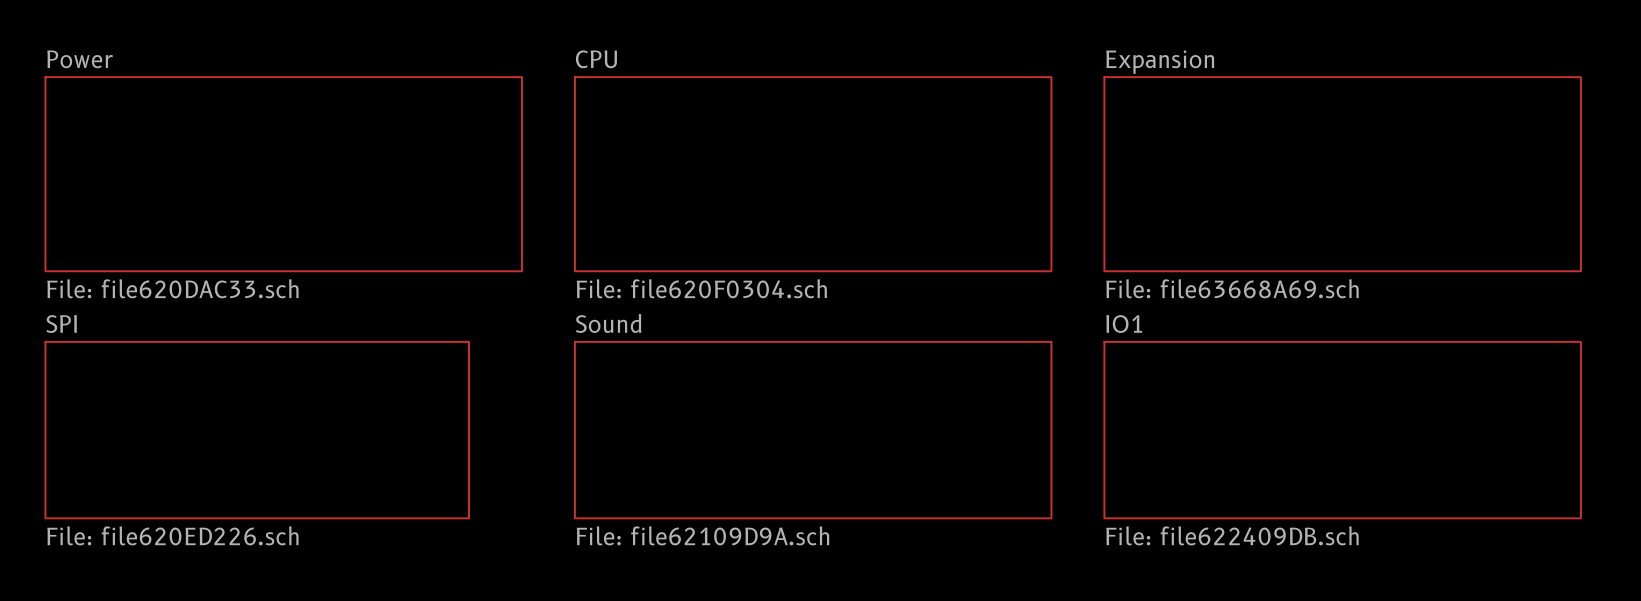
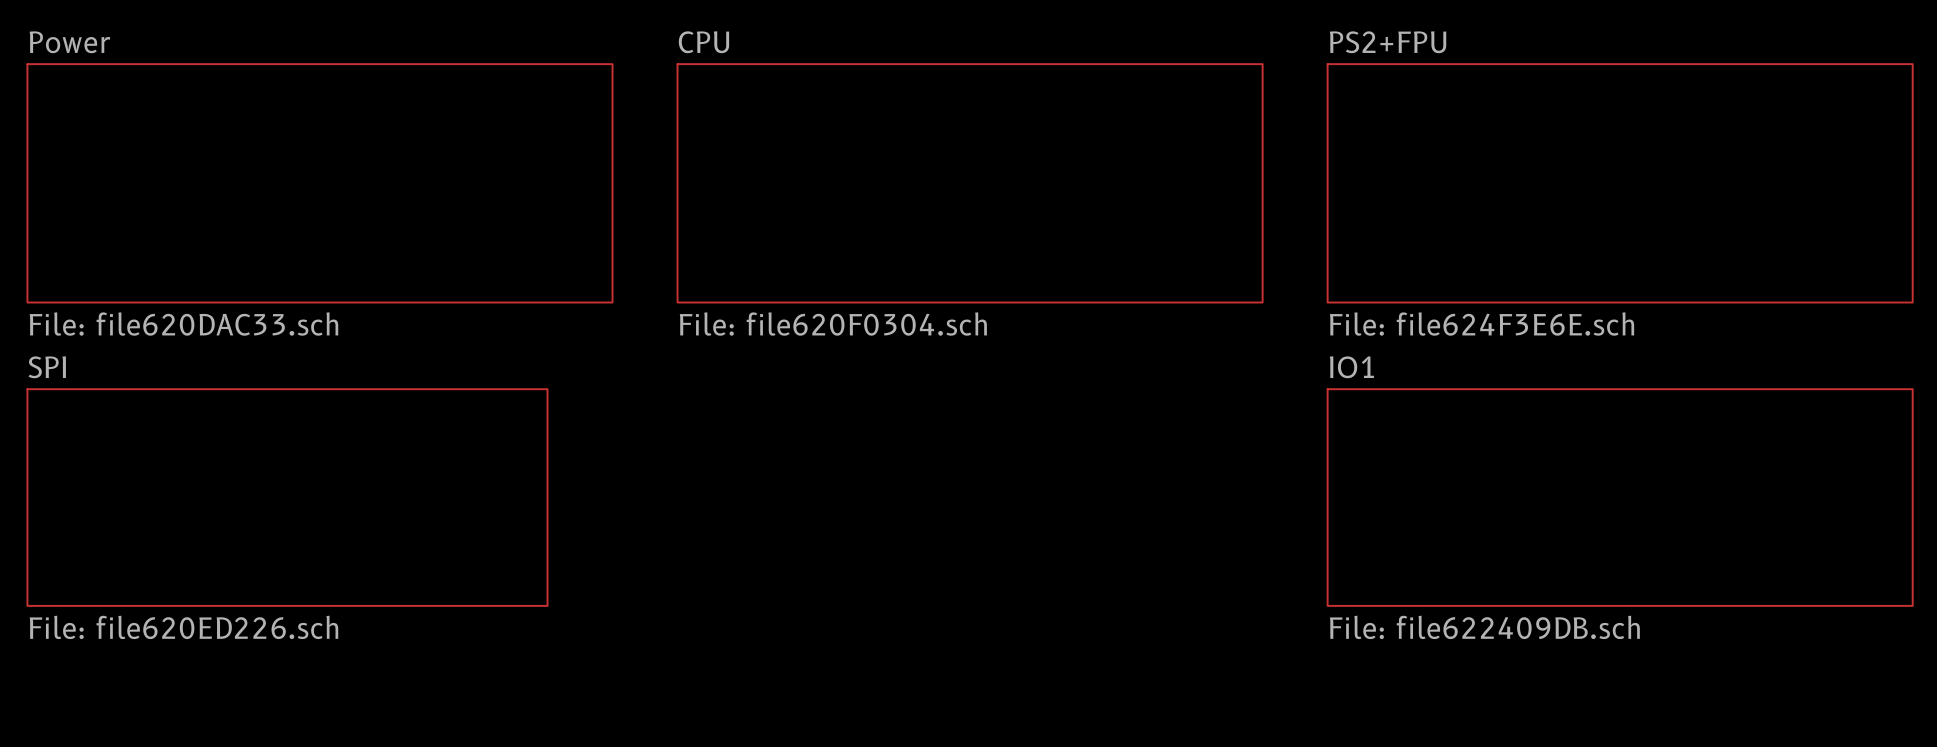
sheet Expansion name: Expansion (1160, 62) -> PS2+FPU (1388, 42)
sheet Expansion value: File: file63668A69.sch (1232, 288) -> File: file624F3E6E.sch (1482, 324)
sheet Sound: File: file62109D9A.sch (813, 430) -> none

